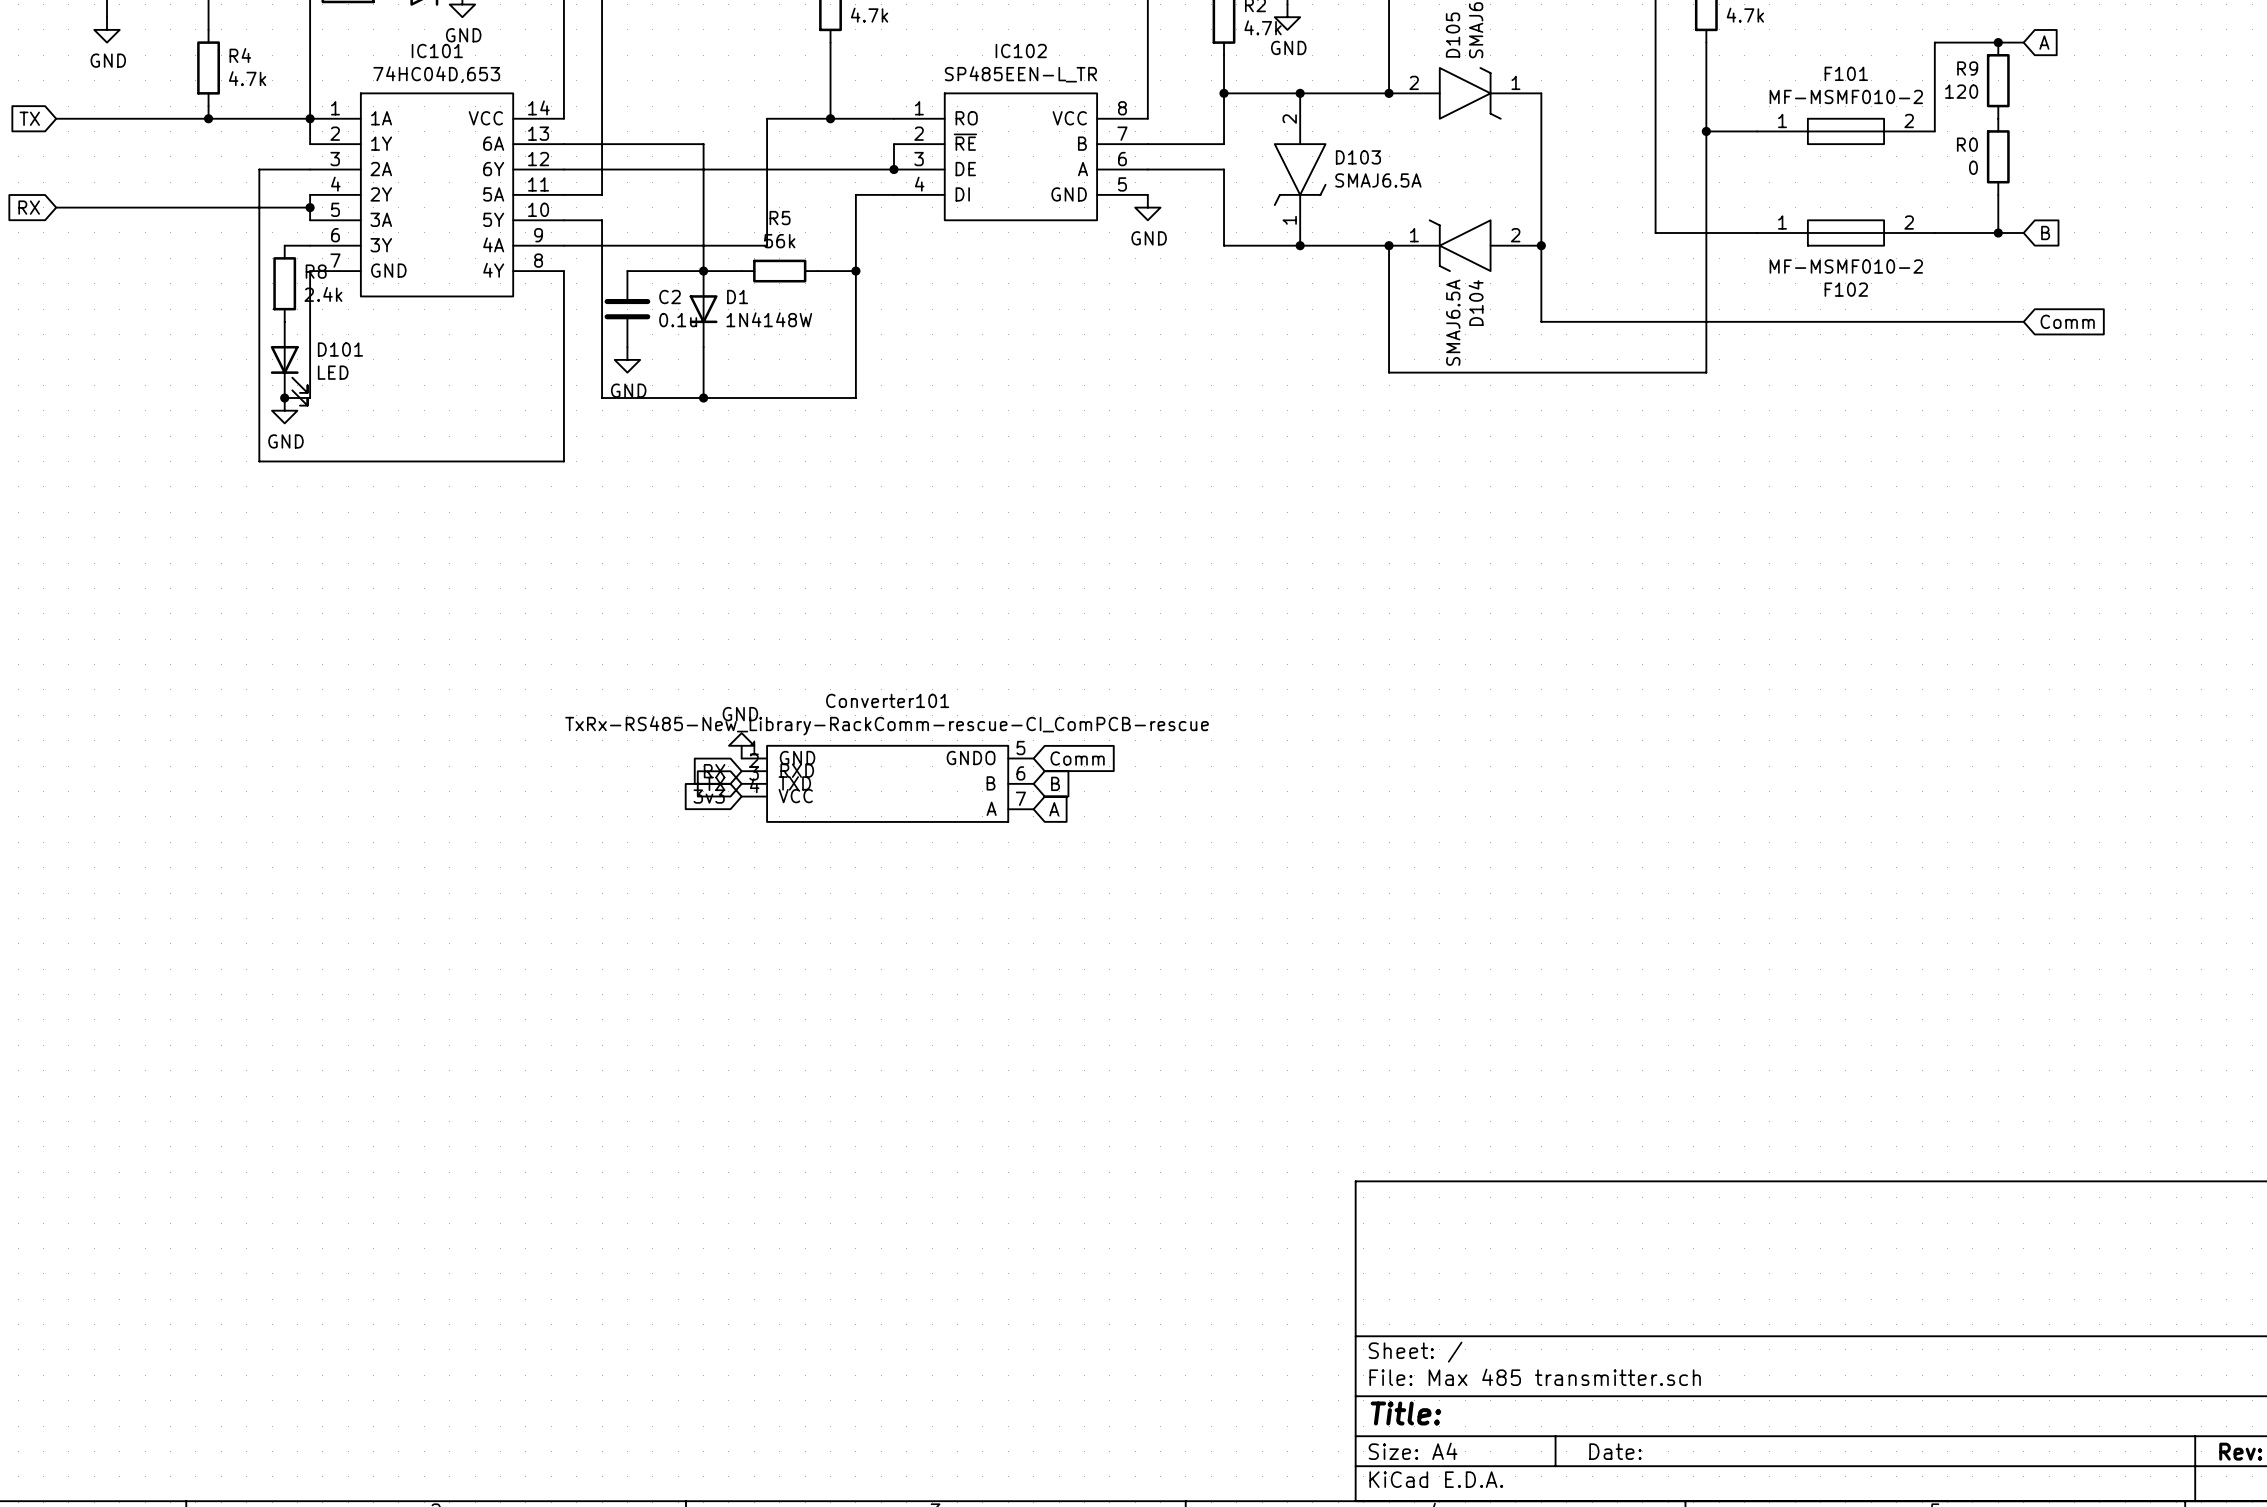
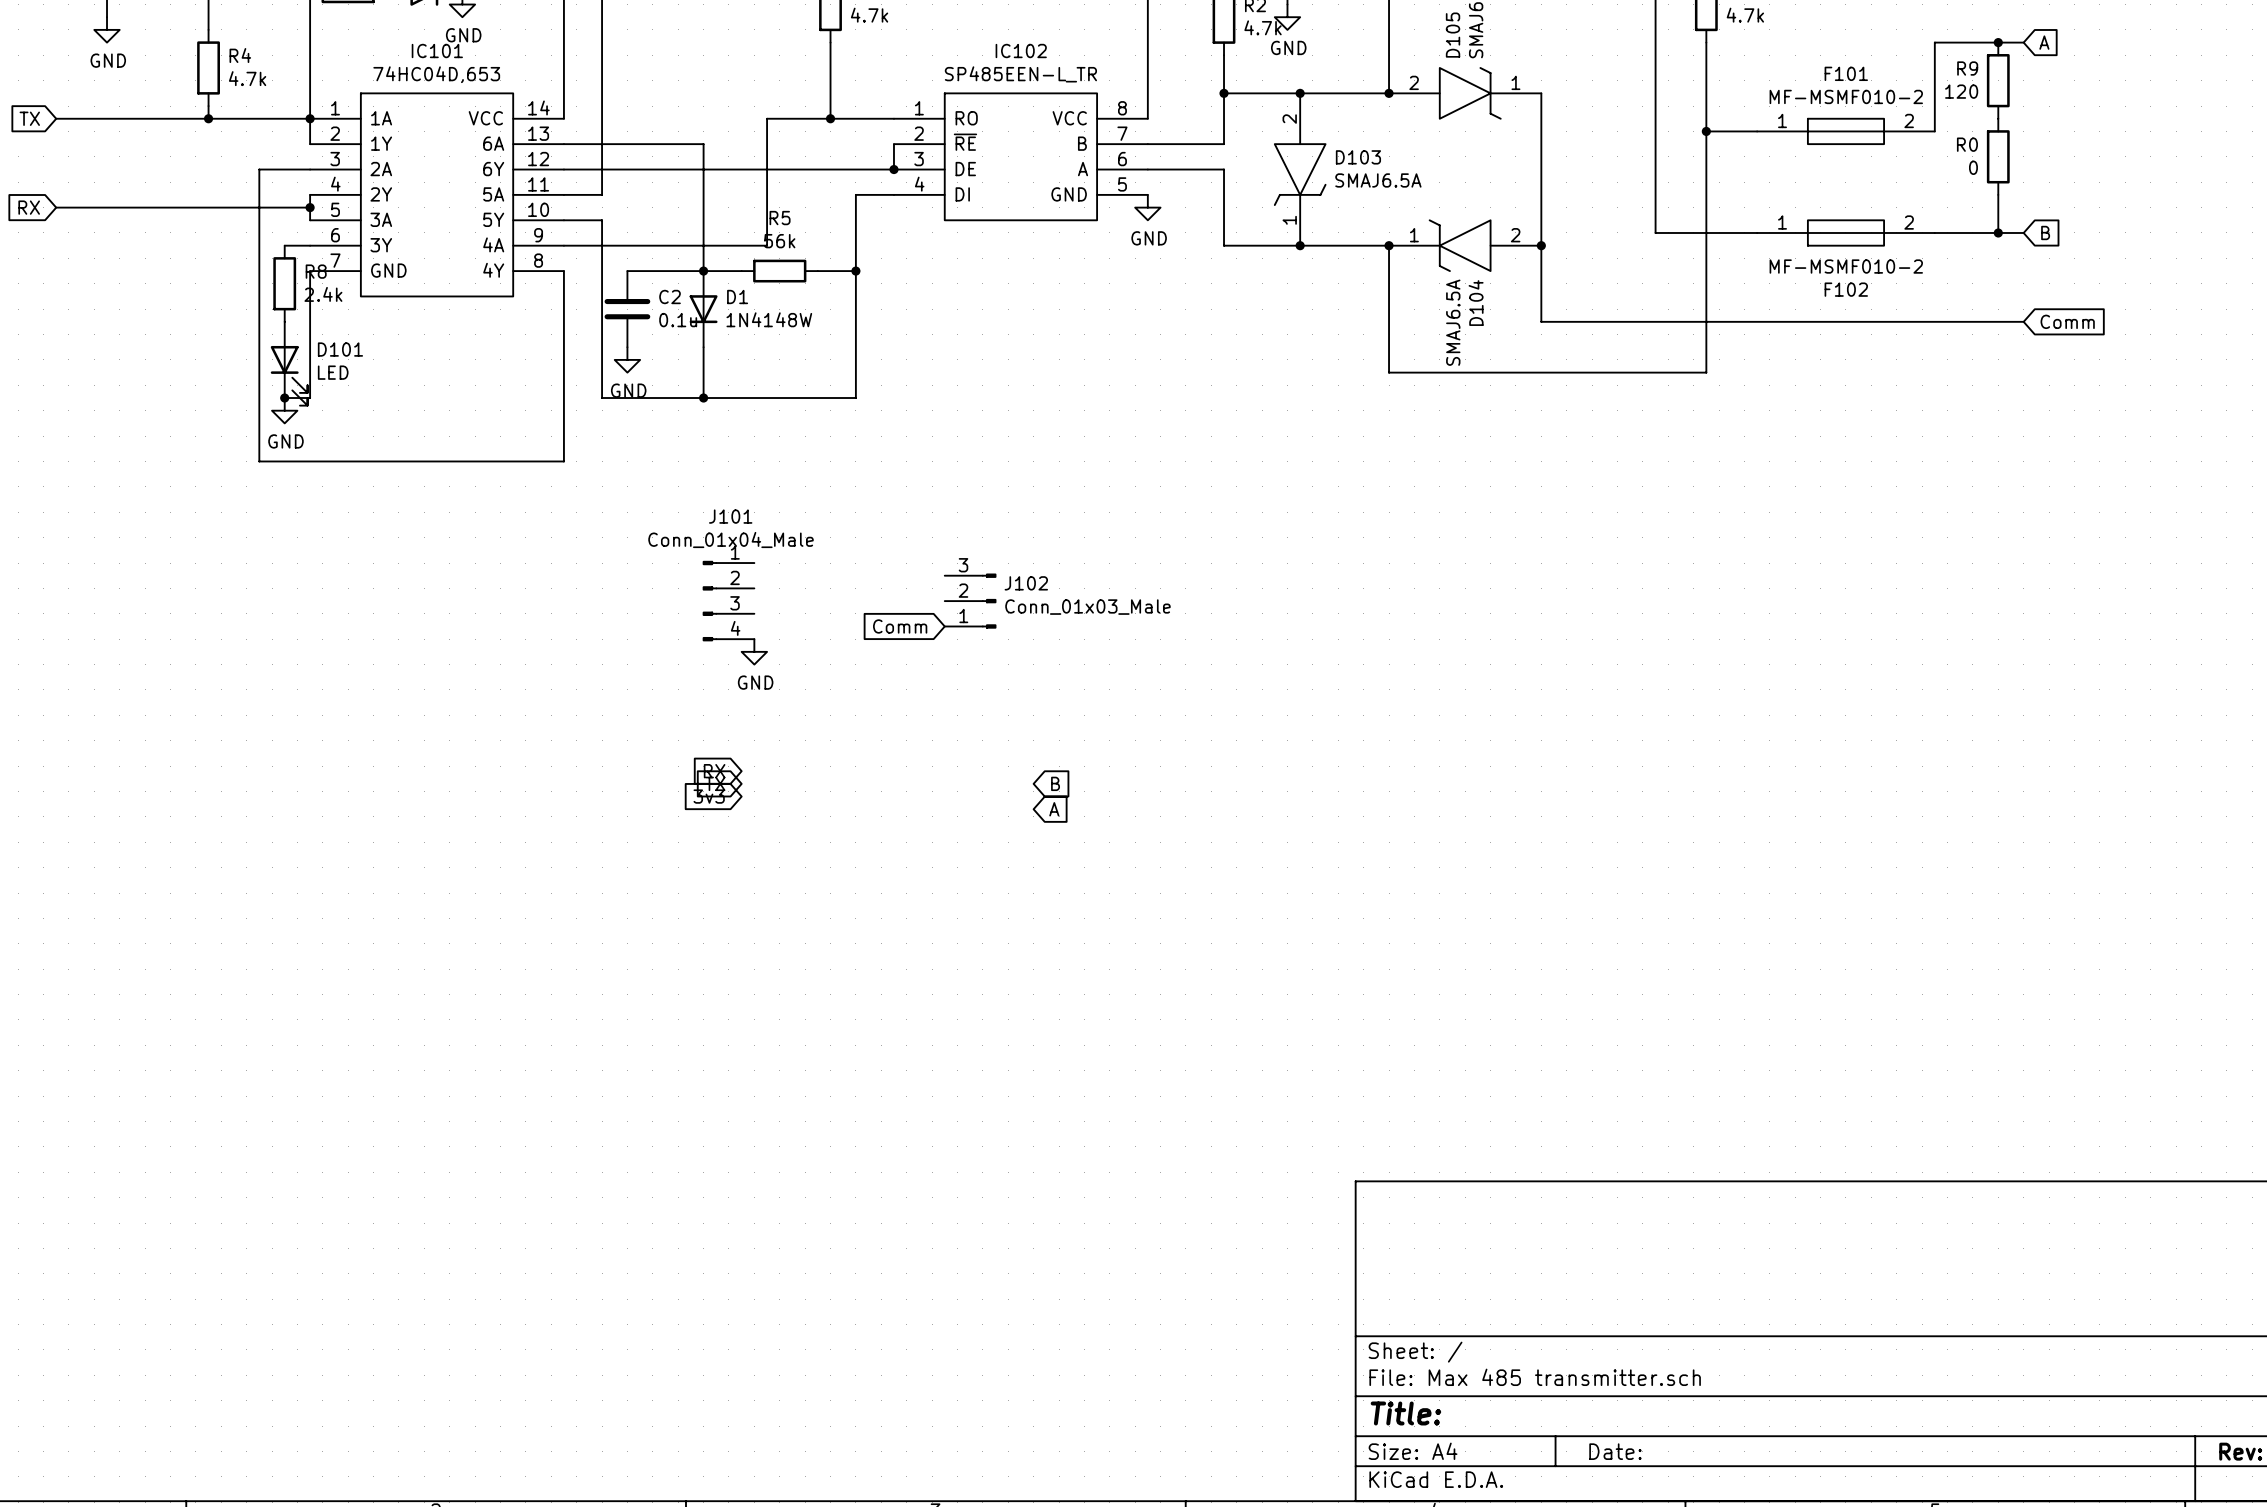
J101: none -> Conn_01x04_Male (728, 601)
J102: none -> Conn_01x03_Male (970, 601)
power symbol rotation: 0° (741, 745) -> 180° (754, 651)
power symbol position: GND (741, 745) -> GND (754, 651)
global label rotation: 0° (1077, 758) -> 180° (900, 626)
global label position: Comm (1077, 758) -> Comm (900, 626)
Converter101: TxRx-RS485-New_Library-RackComm-rescue-CI_ComPCB-rescue (887, 783) -> none

